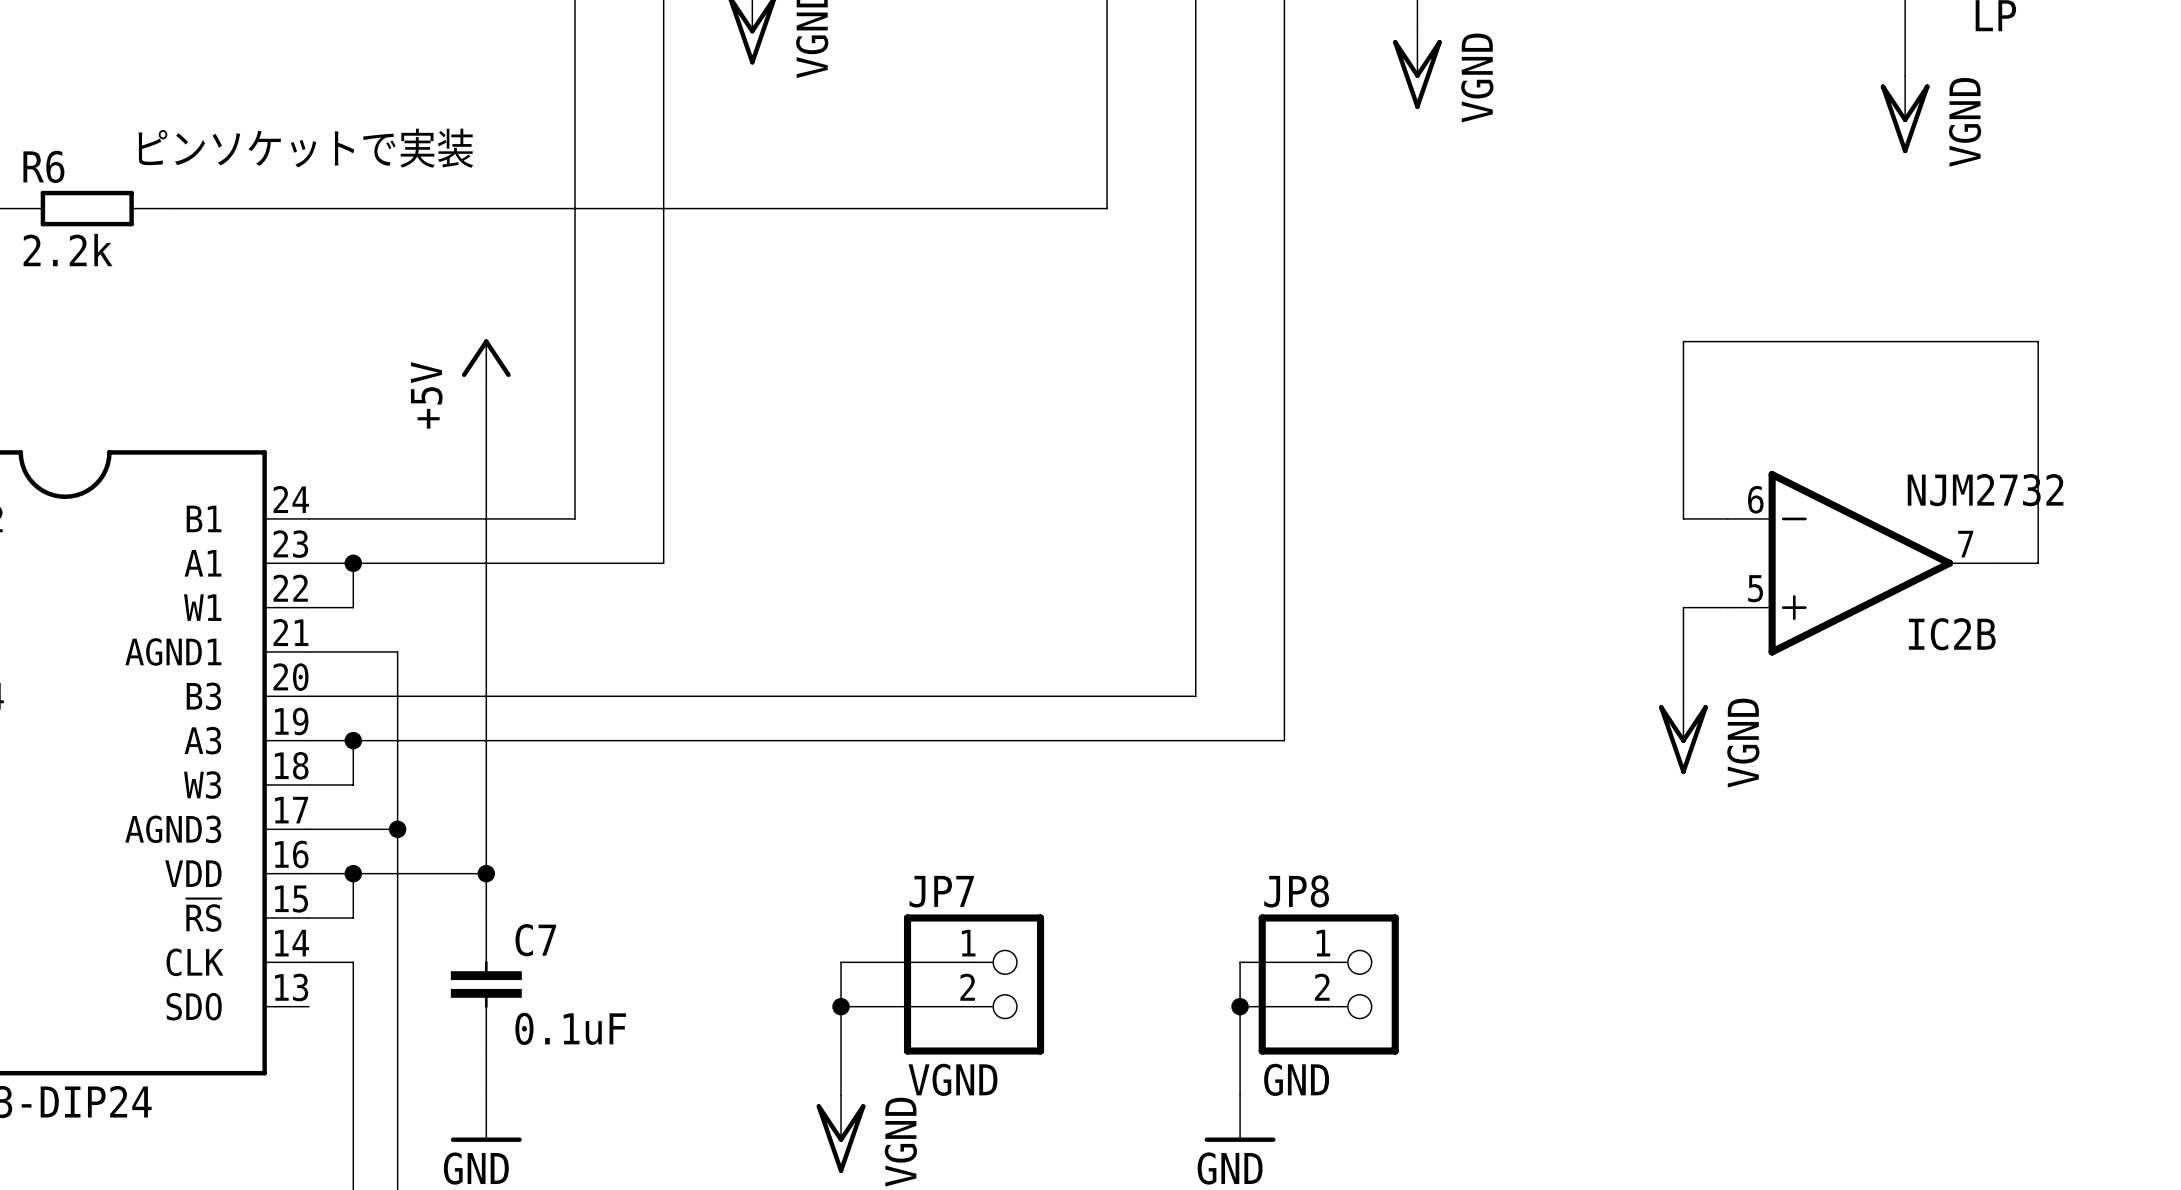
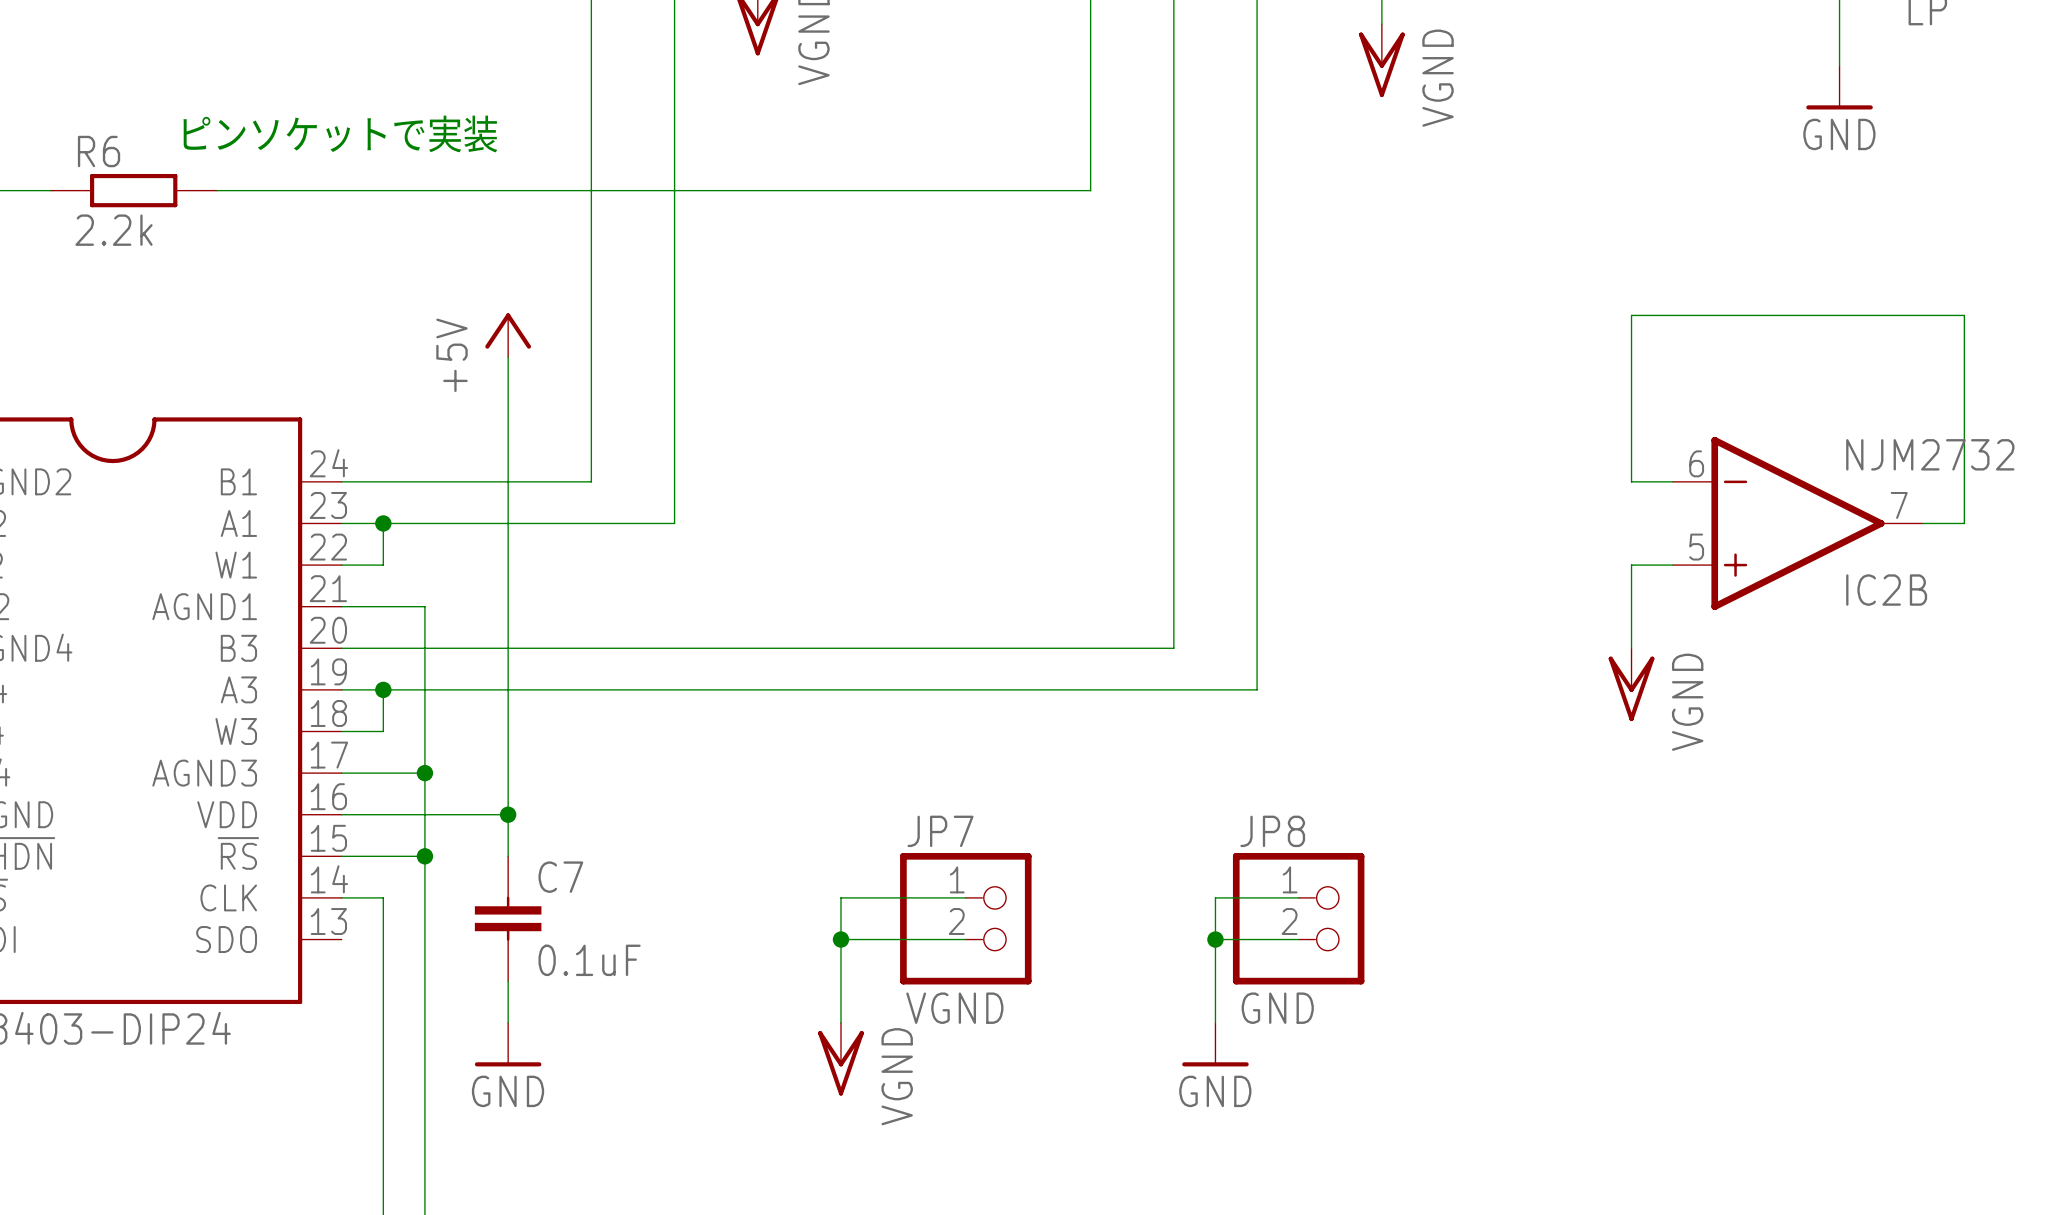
power symbol: VGND (1905, 114) -> GND (1839, 87)
wire: (353, 873) (353, 917) -> (424, 856) (383, 856)
junction position: (353, 873) -> (424, 856)

